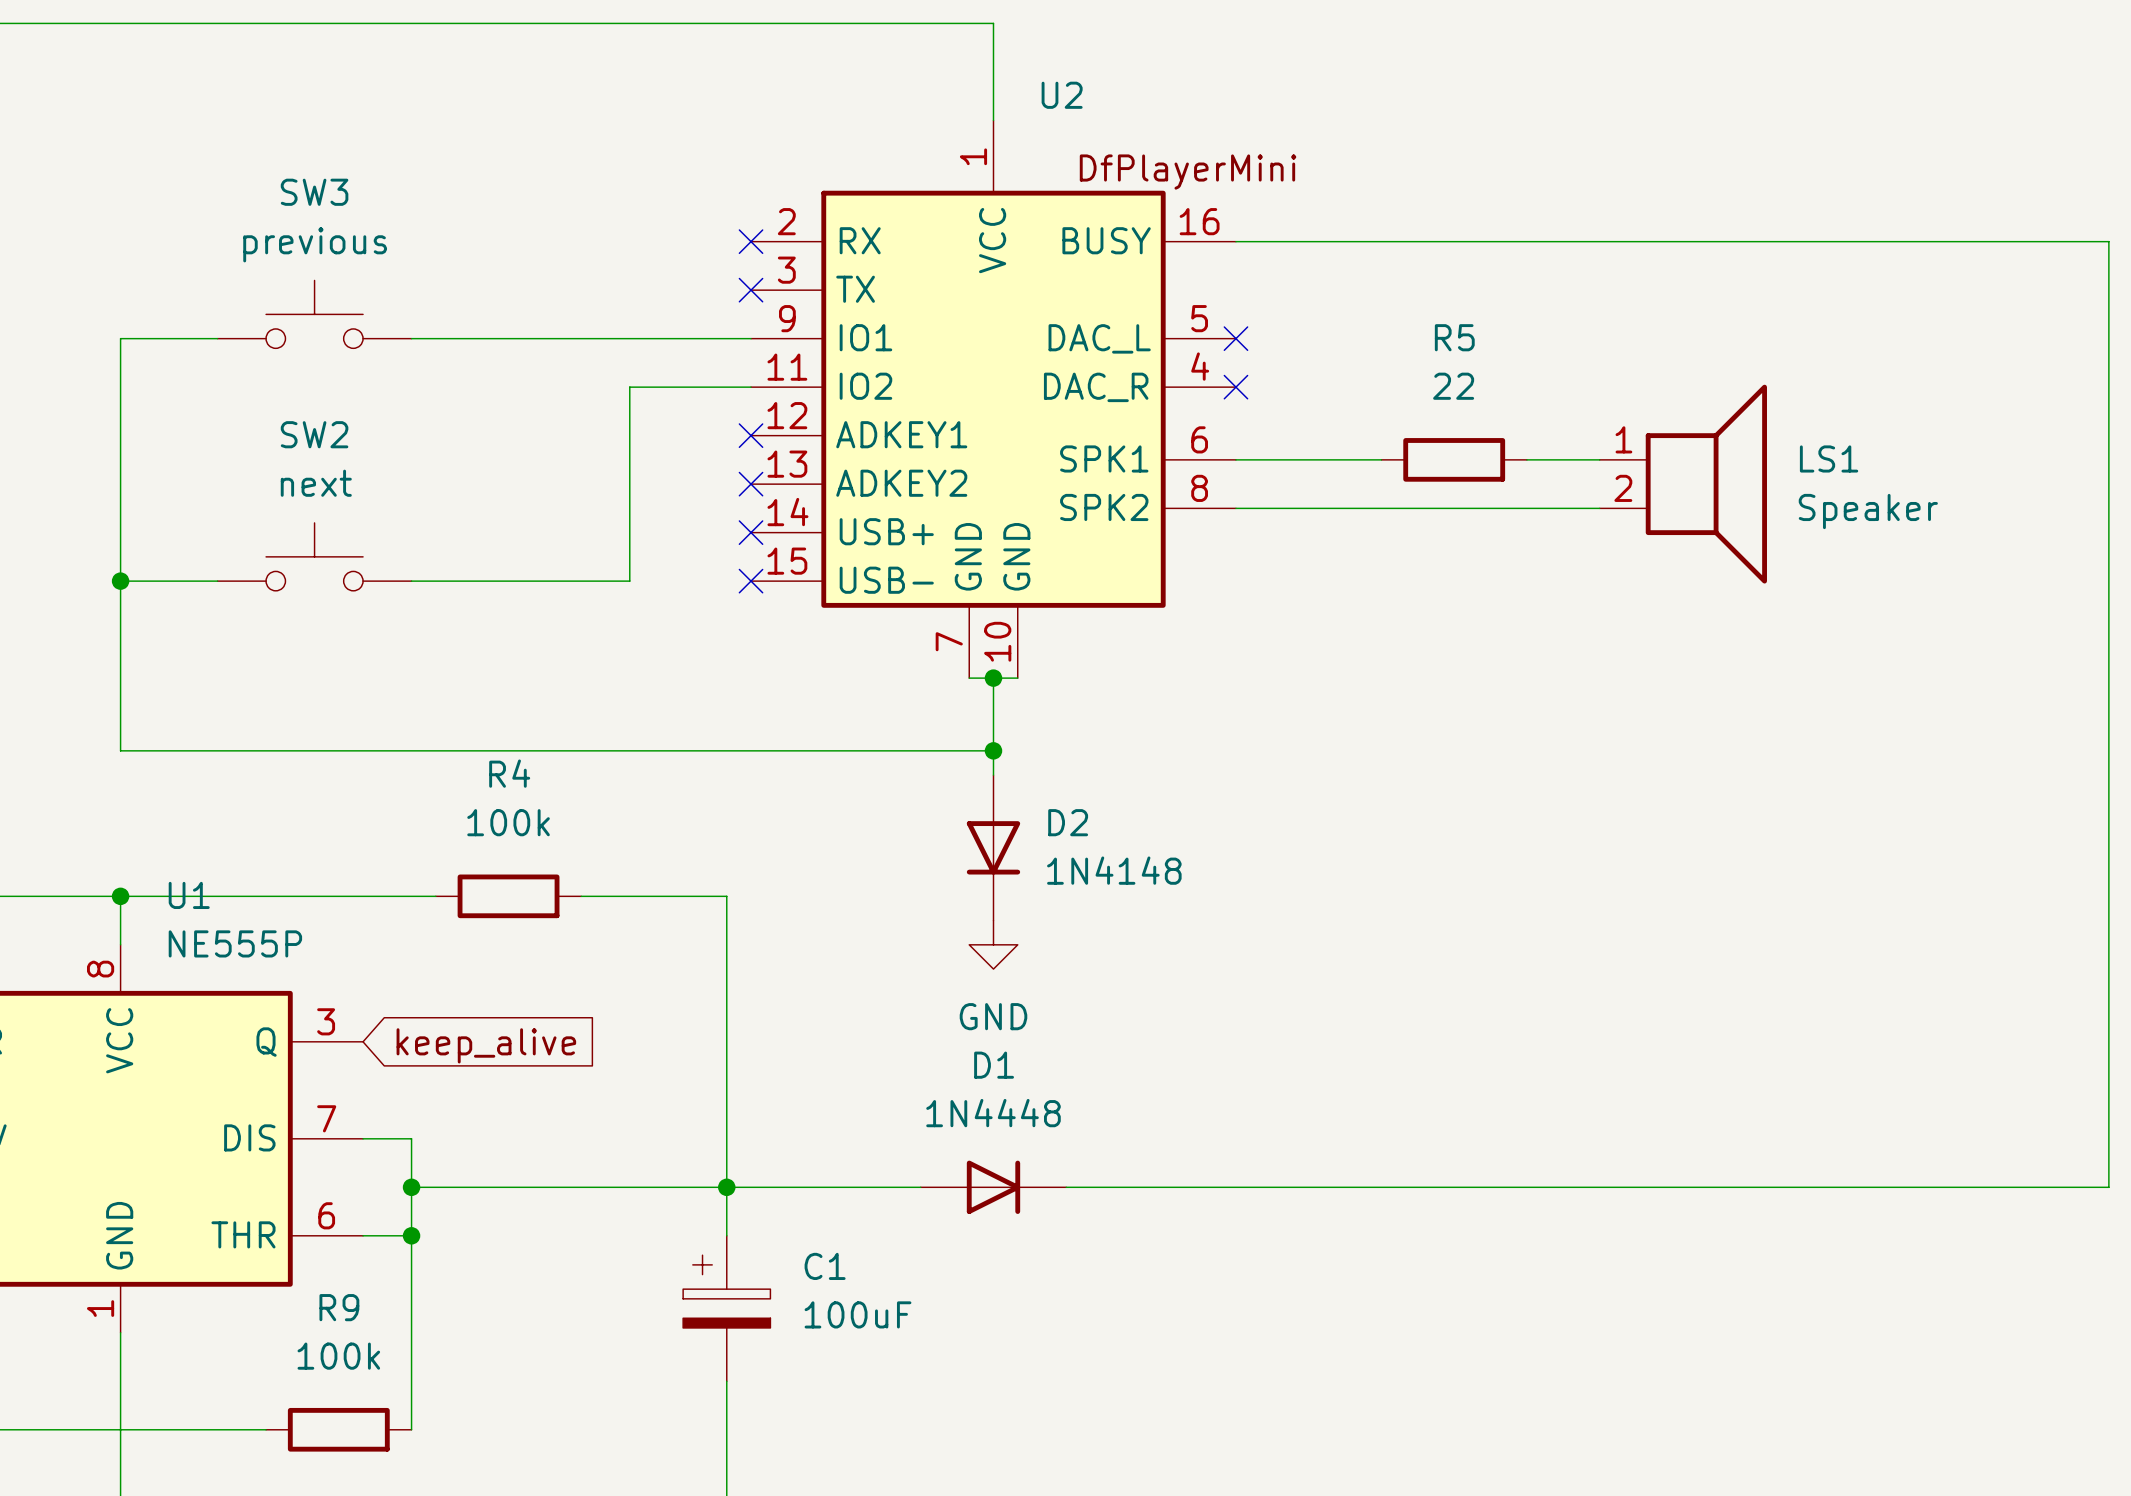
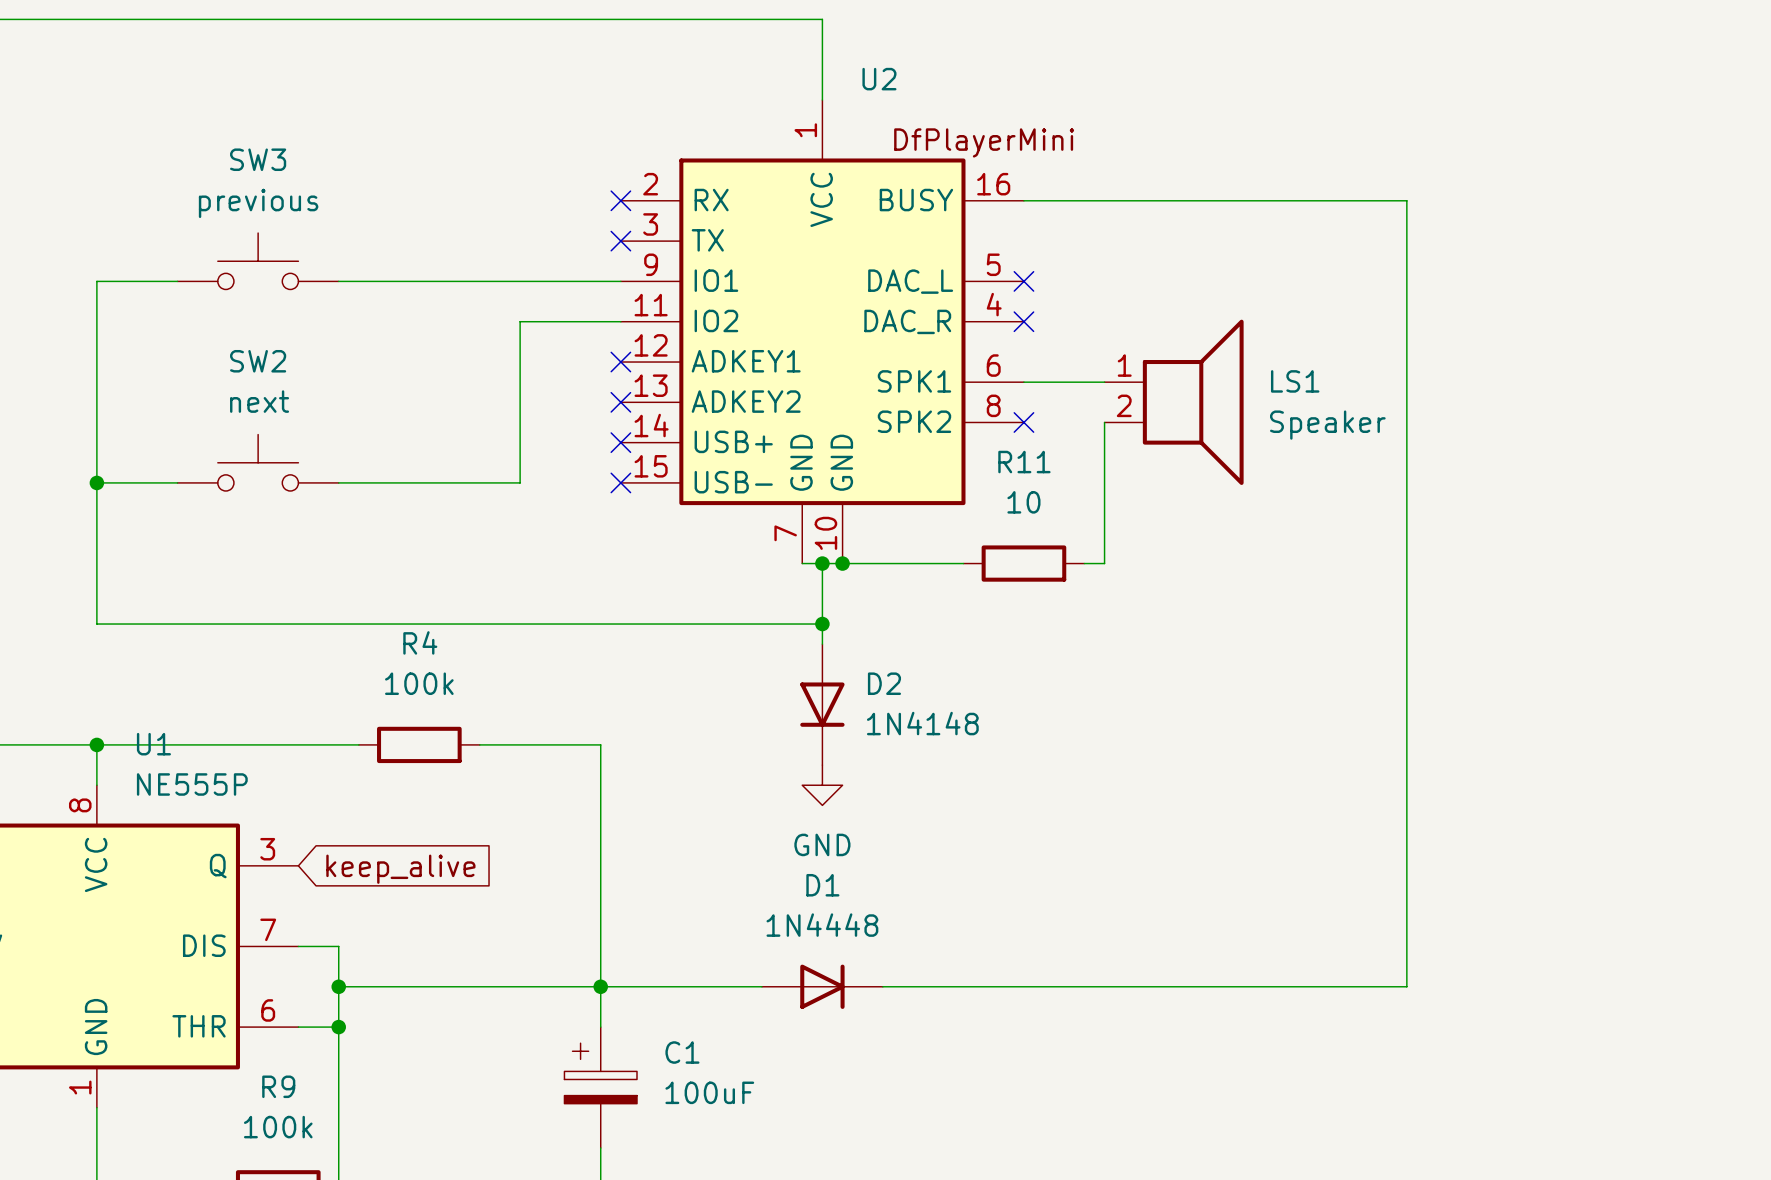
wire: (1696, 241) (2108, 241) (2108, 1187) (1696, 1187) -> (1406, 200) (1406, 986)
R5: 22 (1454, 459) -> none
wire: (1526, 459) (1599, 459) -> none
LS1 position: (1683, 484) -> (1174, 402)
wire: (1235, 508) (1599, 508) -> none
no-connect mark: none -> (1023, 422)
wire: none -> (1104, 422) (1104, 563) (1084, 563)
wire: none -> (842, 563) (963, 563)
junction: none -> (842, 563)
R11: none -> 10 (1023, 563)

